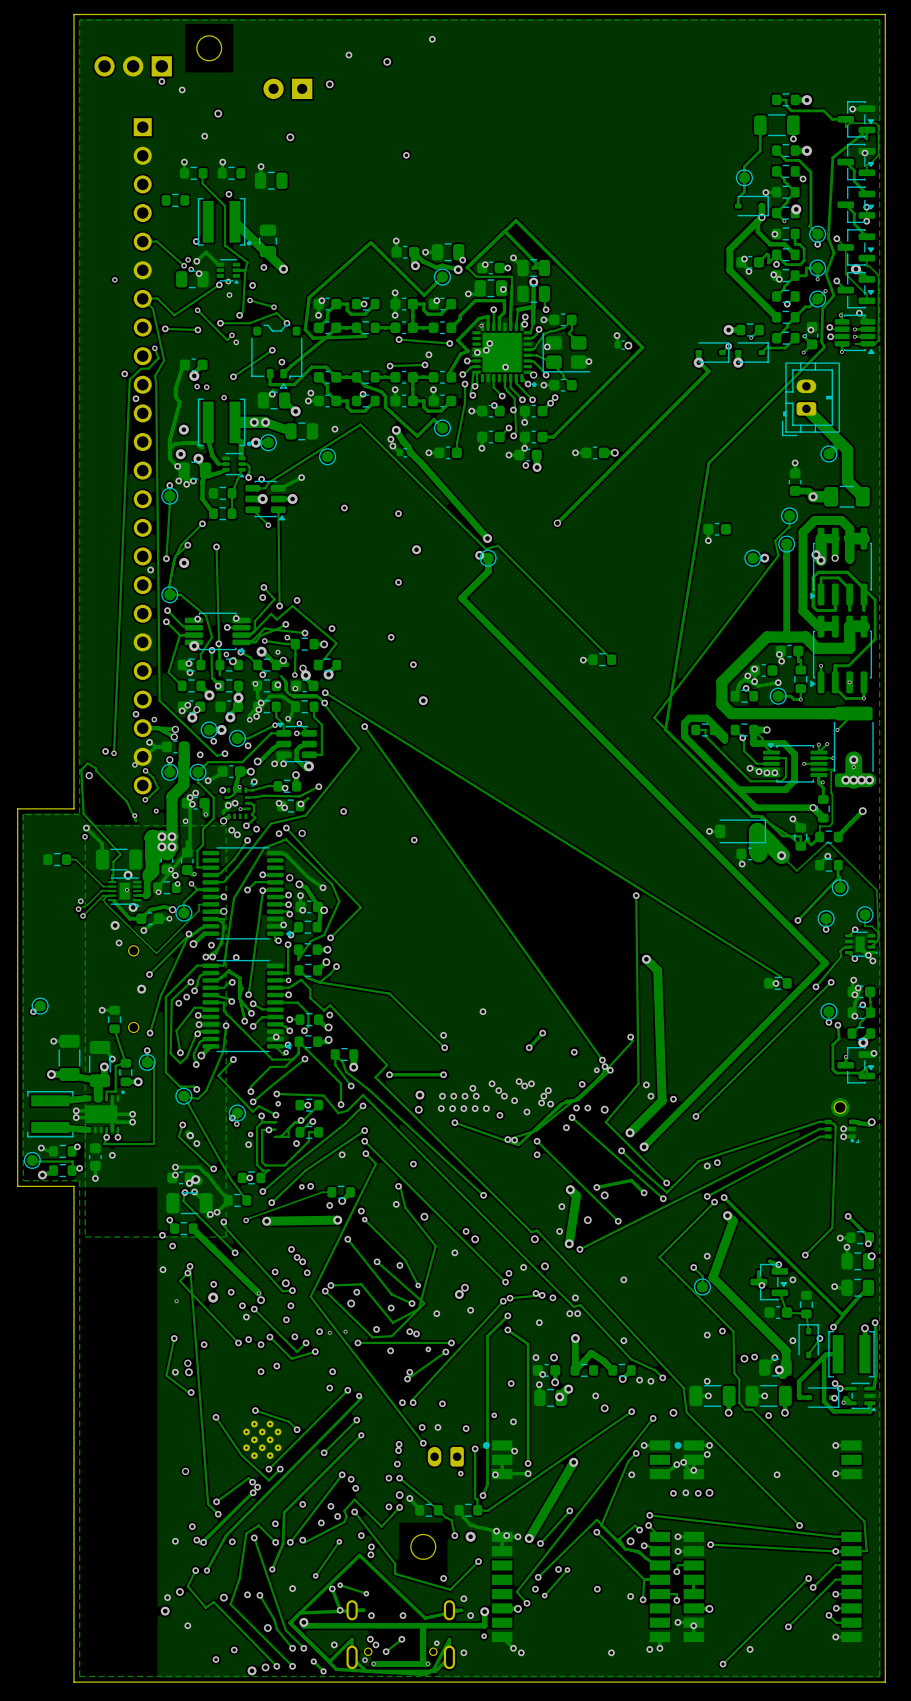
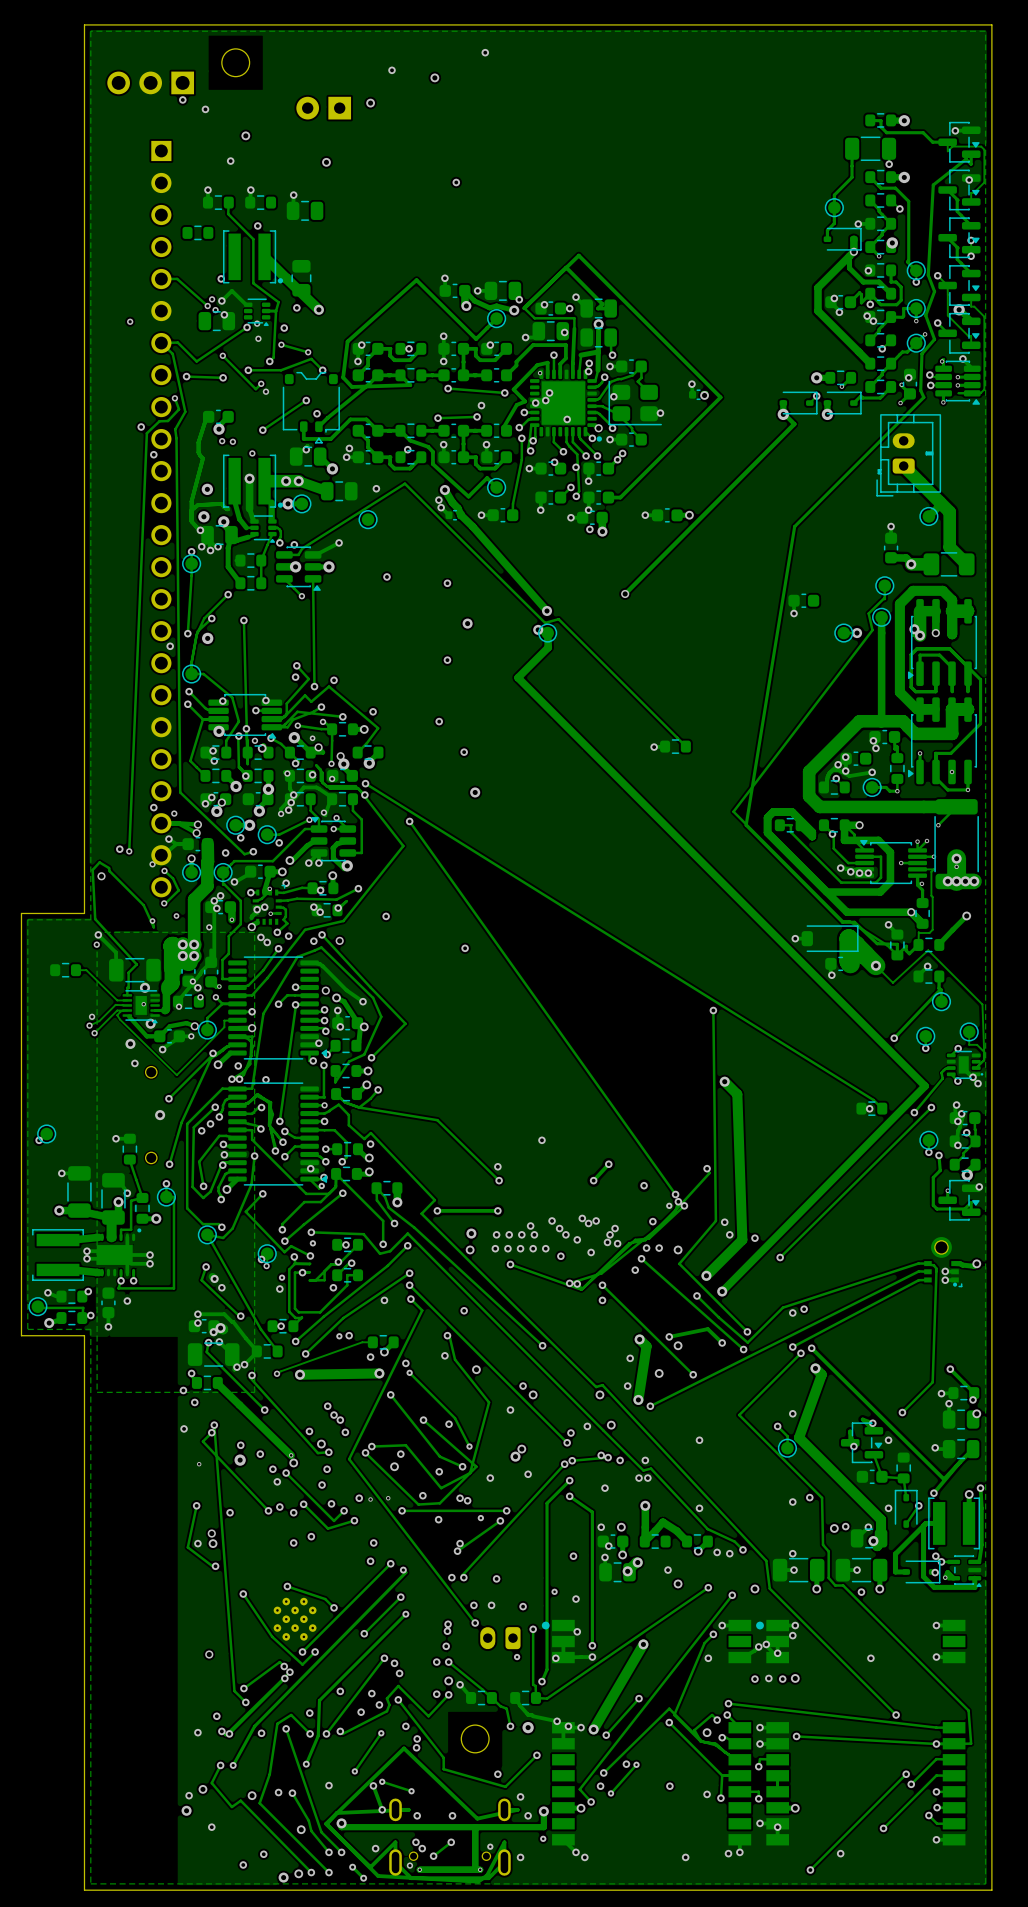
track: none -> (249, 478) (249, 508) (253, 520)
via: none -> (249, 478)

